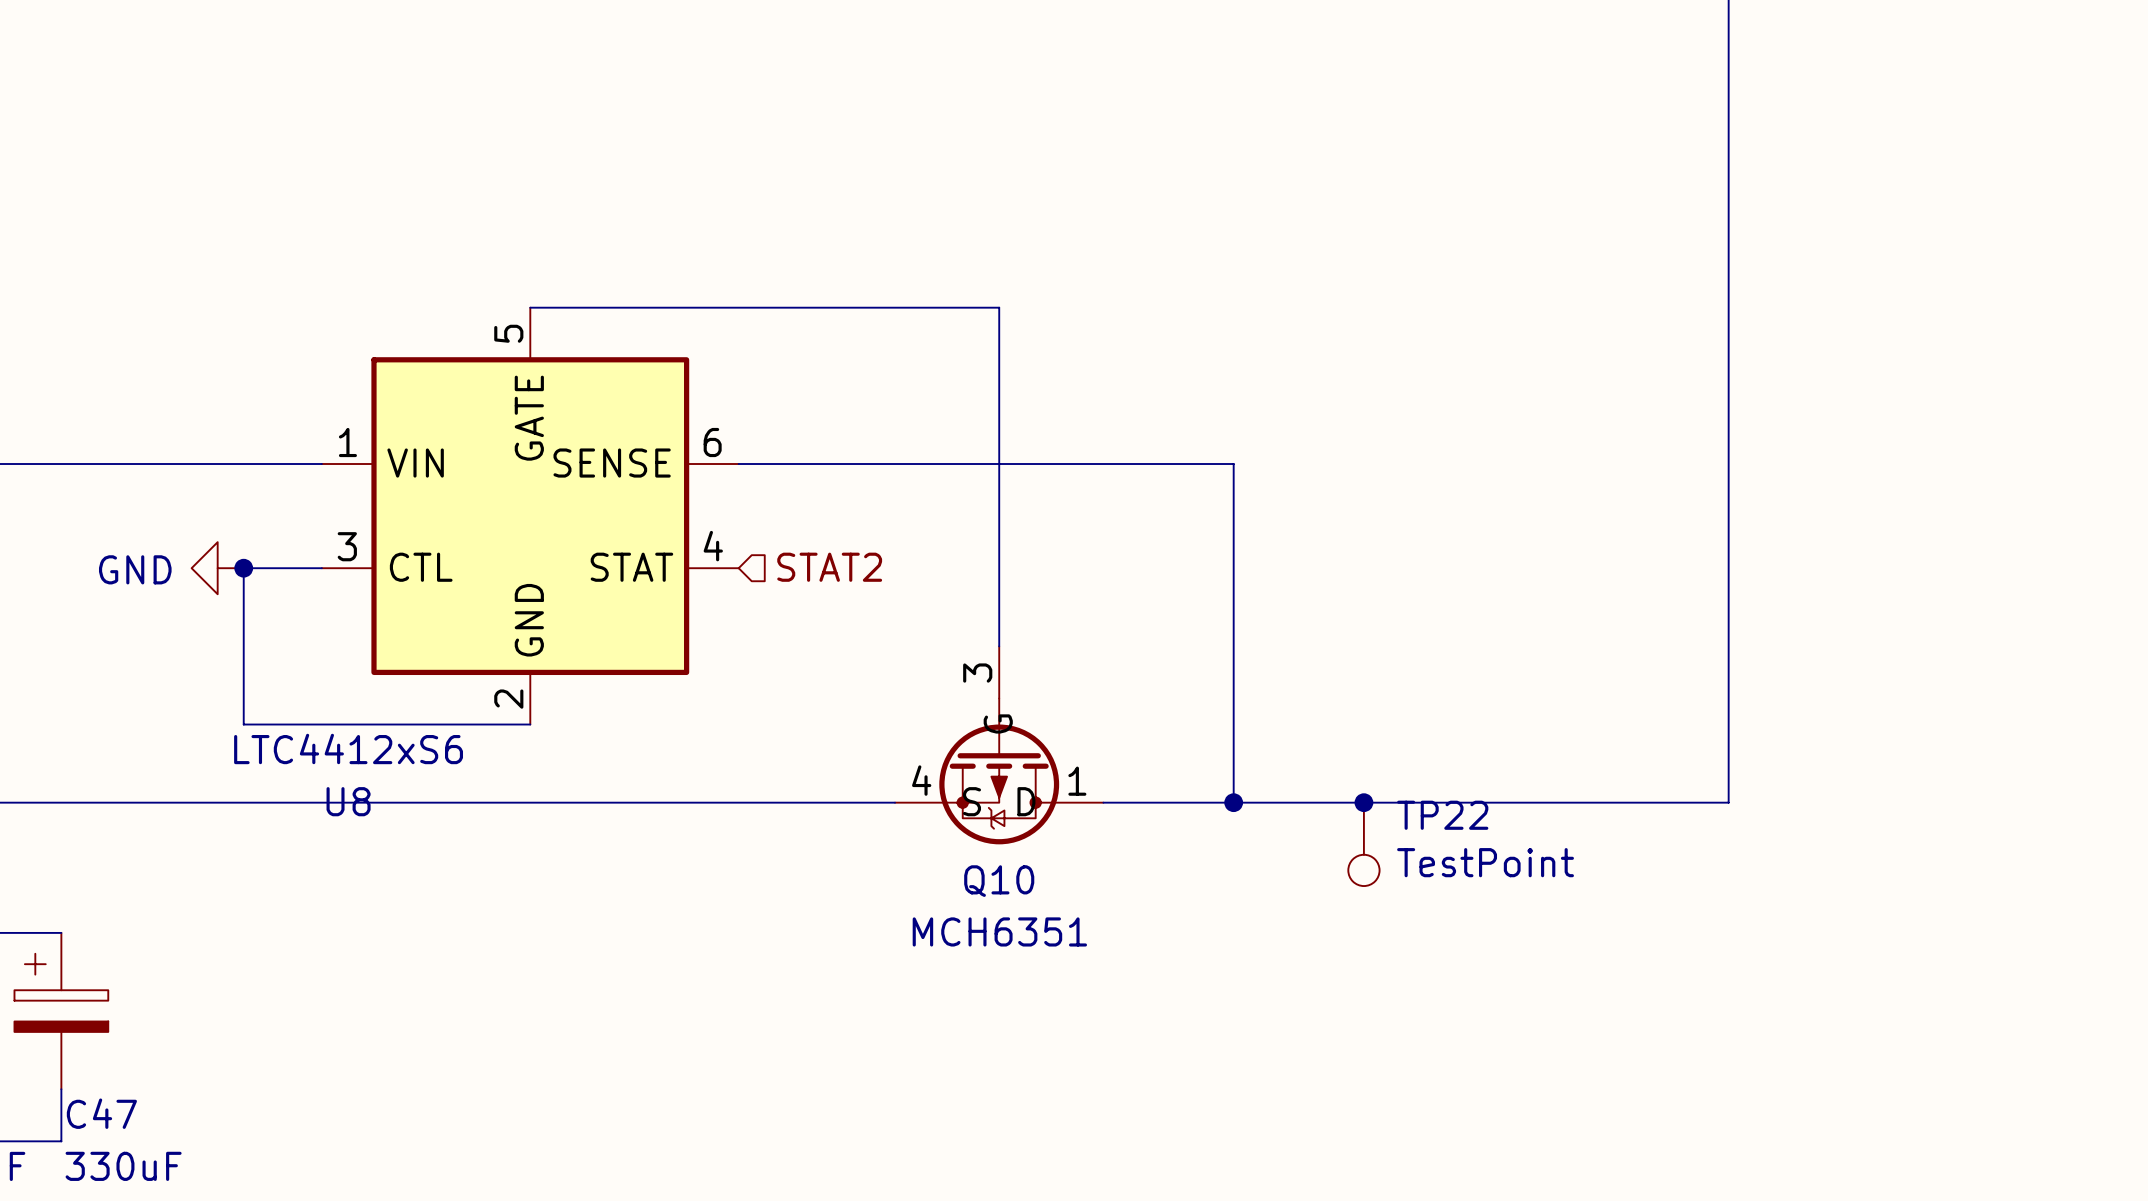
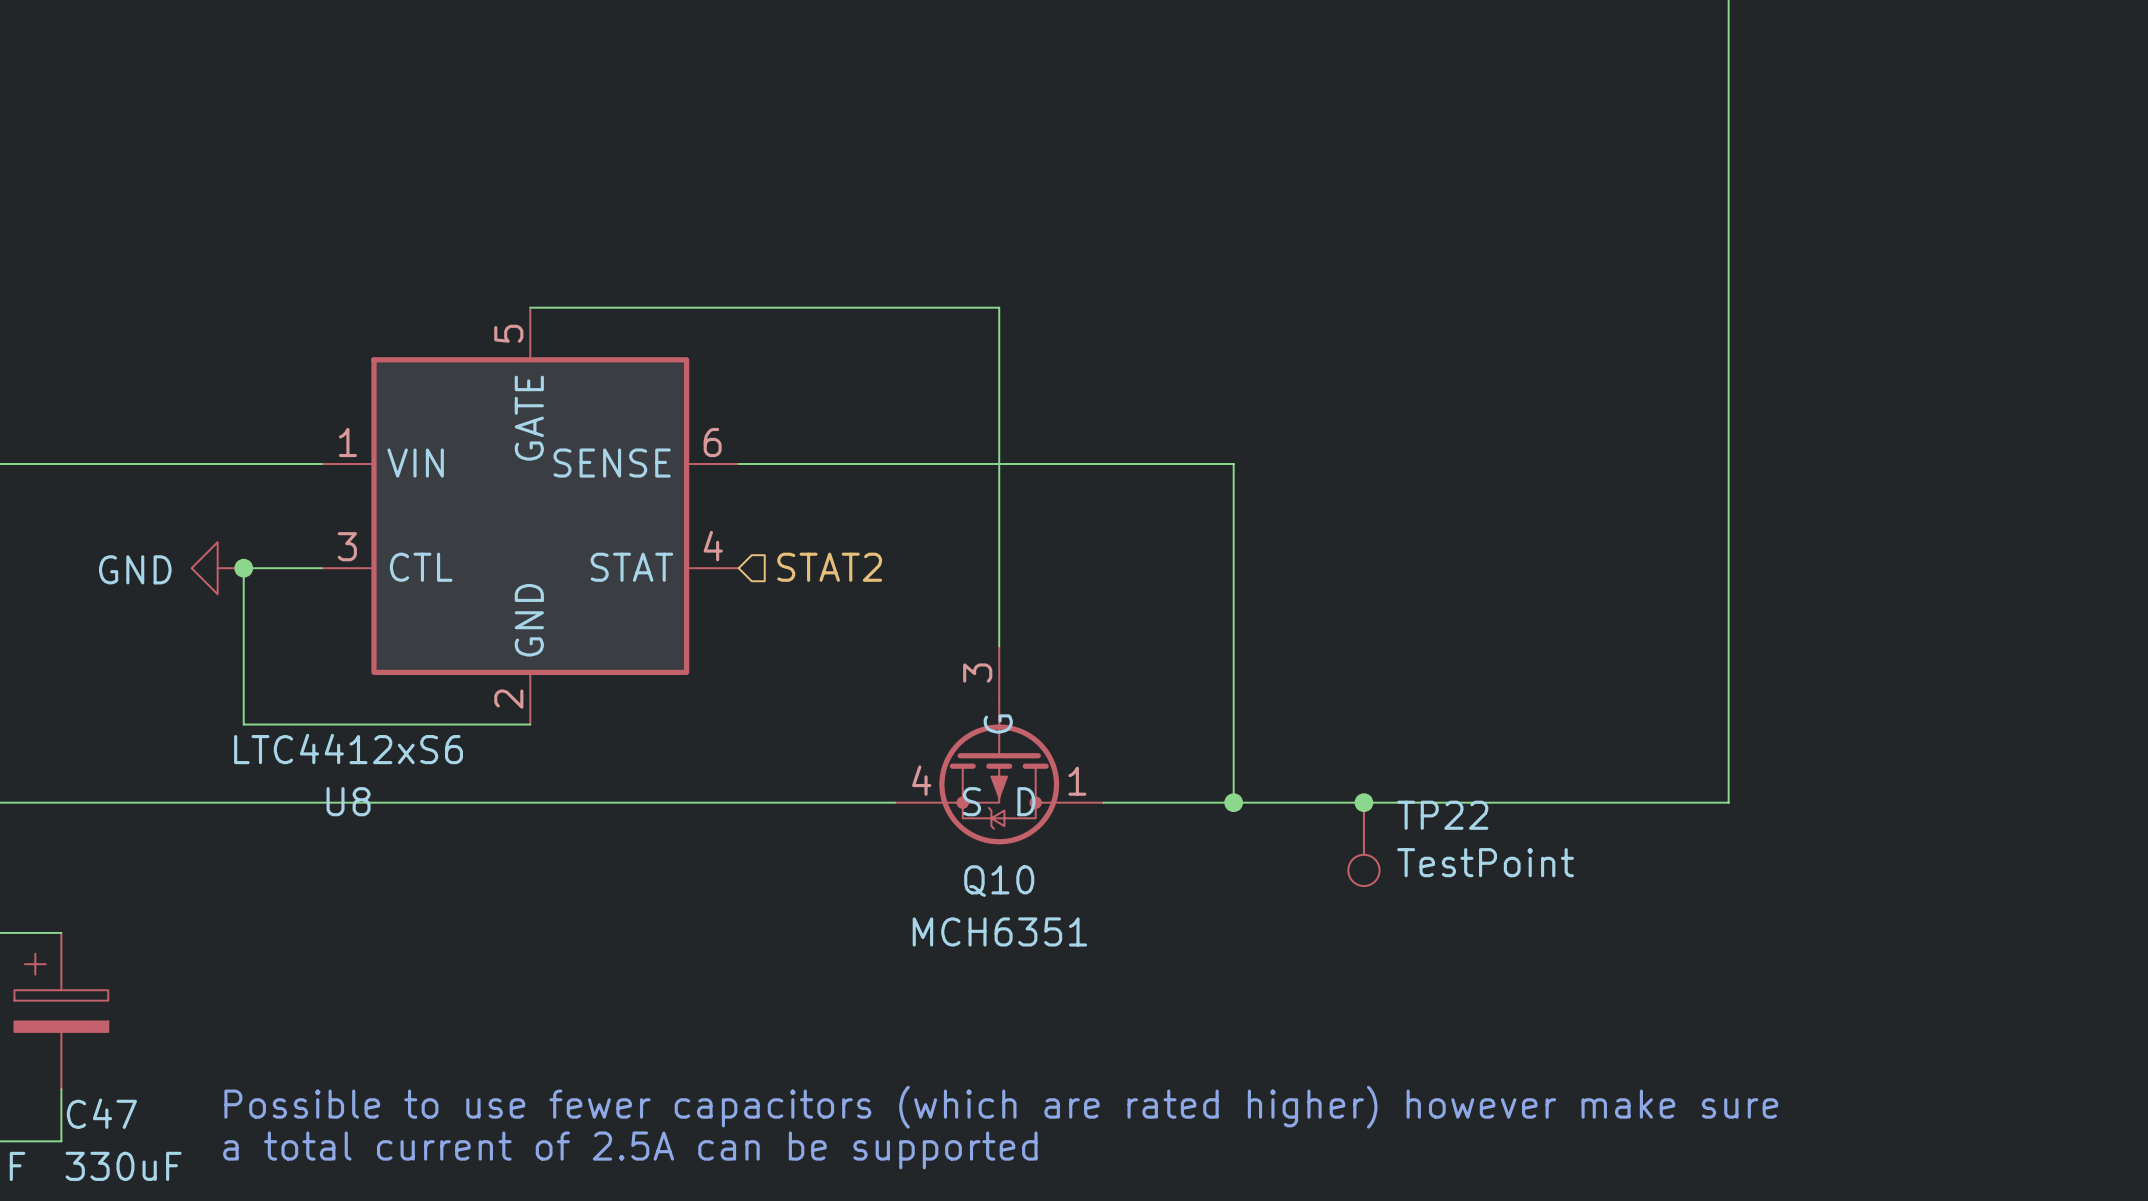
text: none -> Possible to use fewer capacitors (which are rated higher) however make sure (1001, 1107)
text: none -> a total current of 2.5A can be supported (630, 1150)

